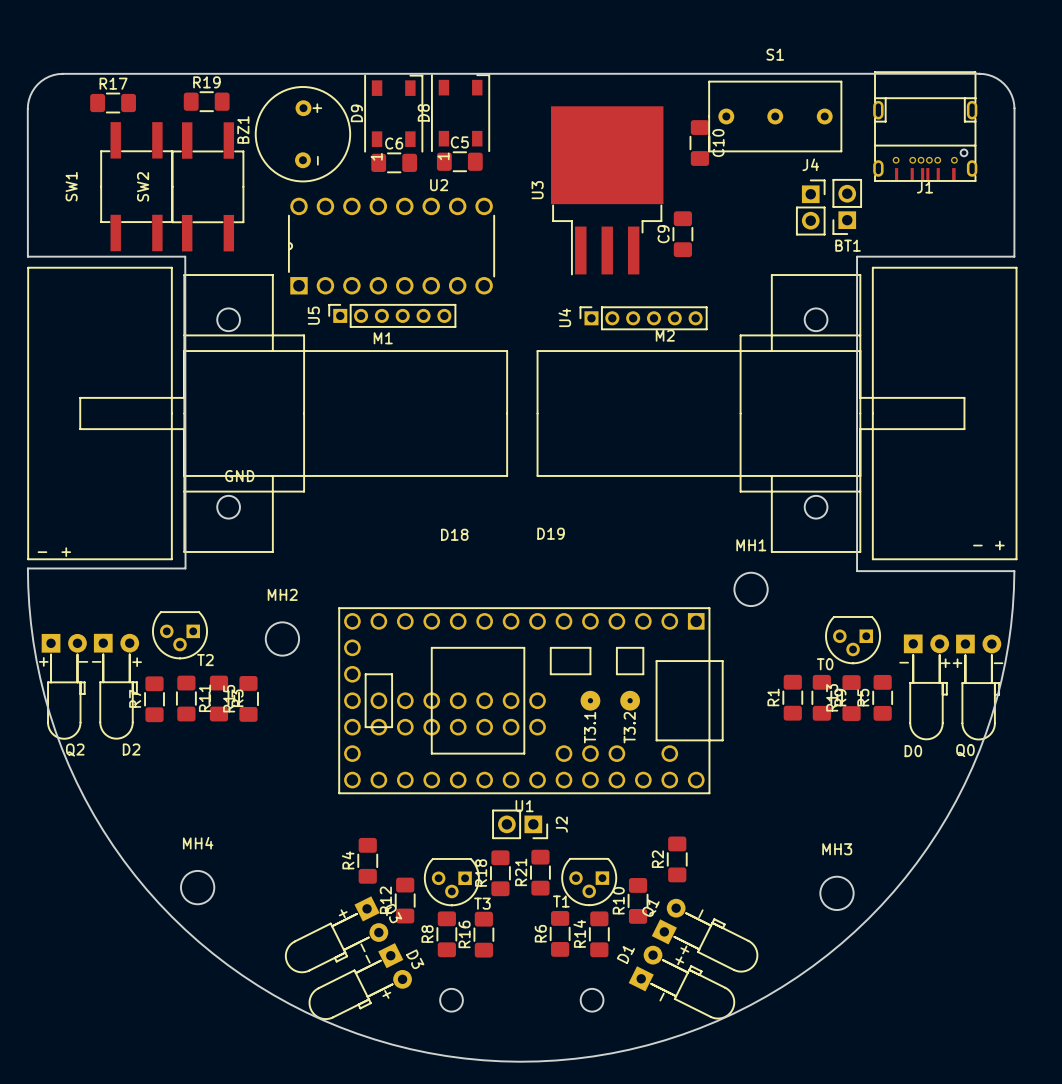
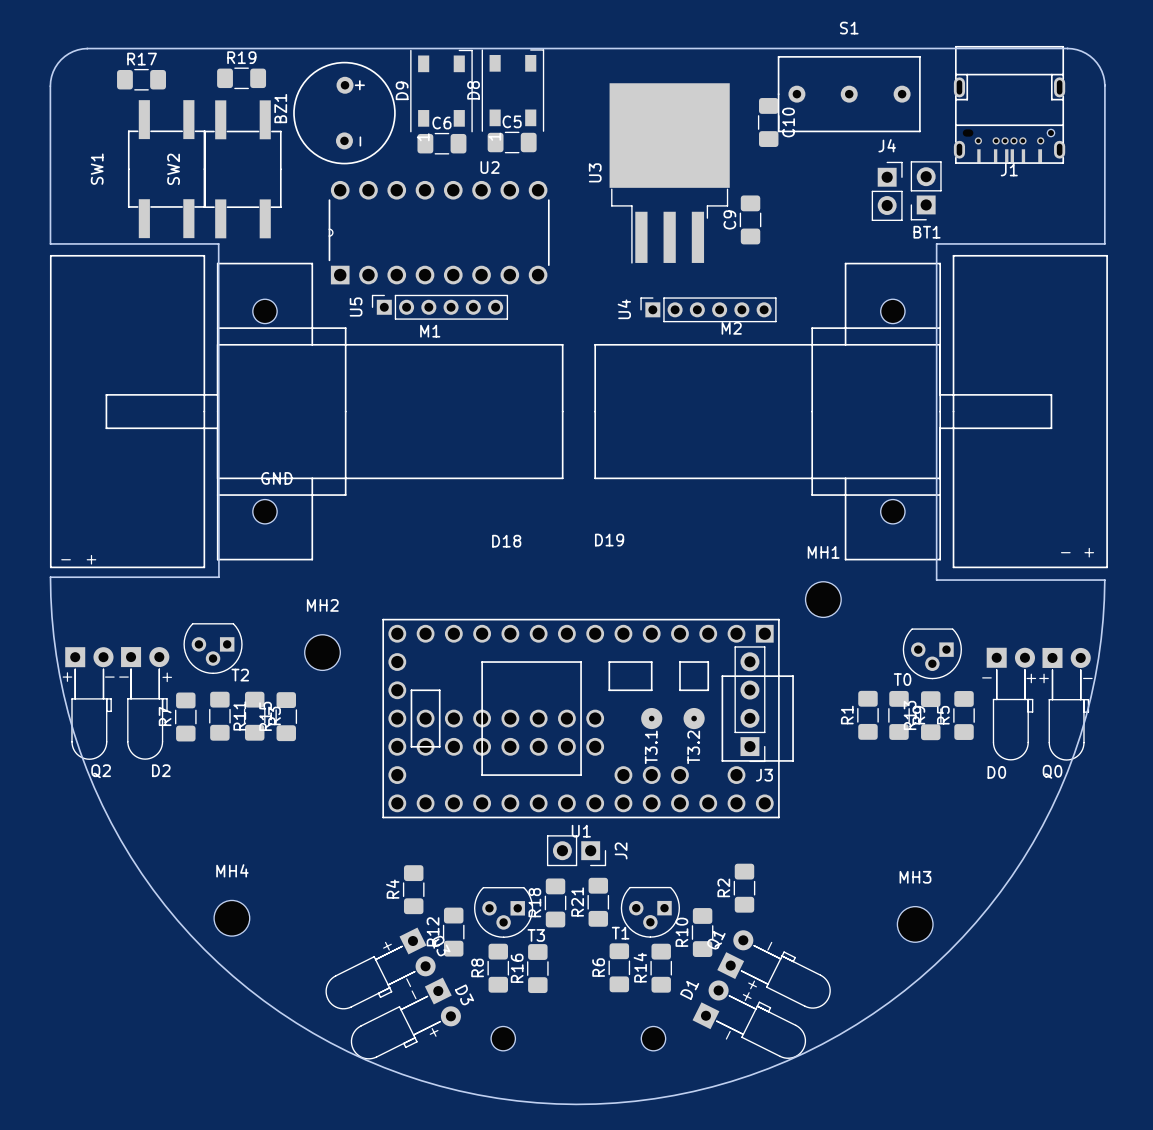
J3: none -> (749, 704)

